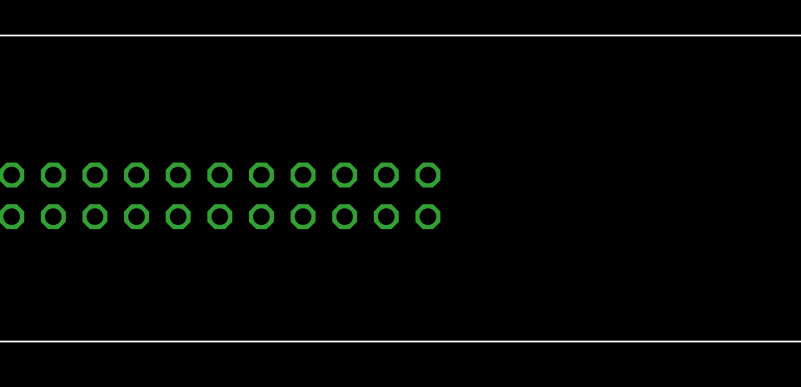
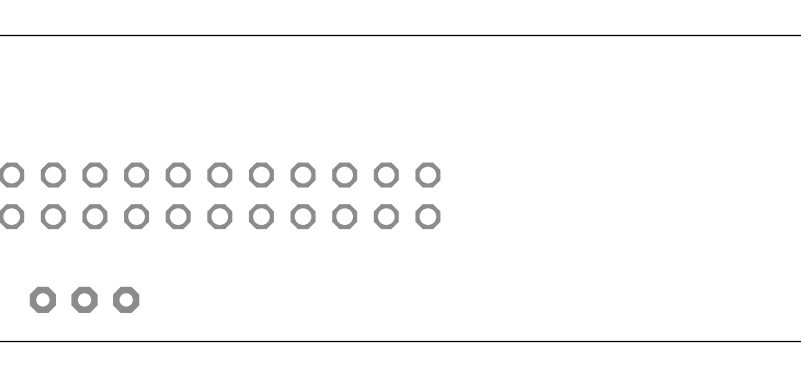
part: none -> (42, 299)
part: none -> (84, 299)
part: none -> (126, 299)

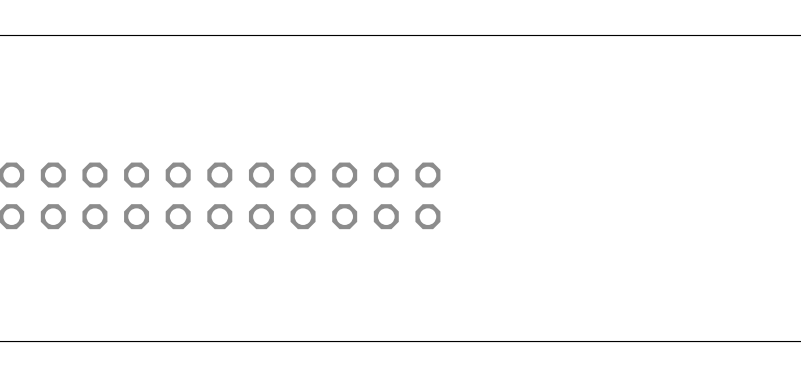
part: (42, 299) -> none
part: (84, 299) -> none
part: (126, 299) -> none

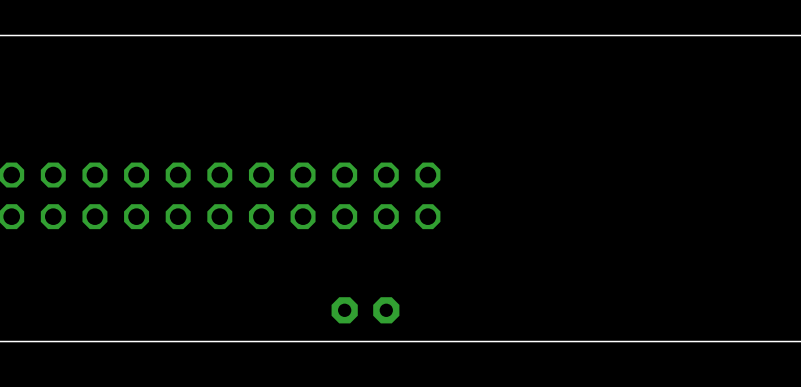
part: none -> (344, 310)
part: none -> (386, 310)

